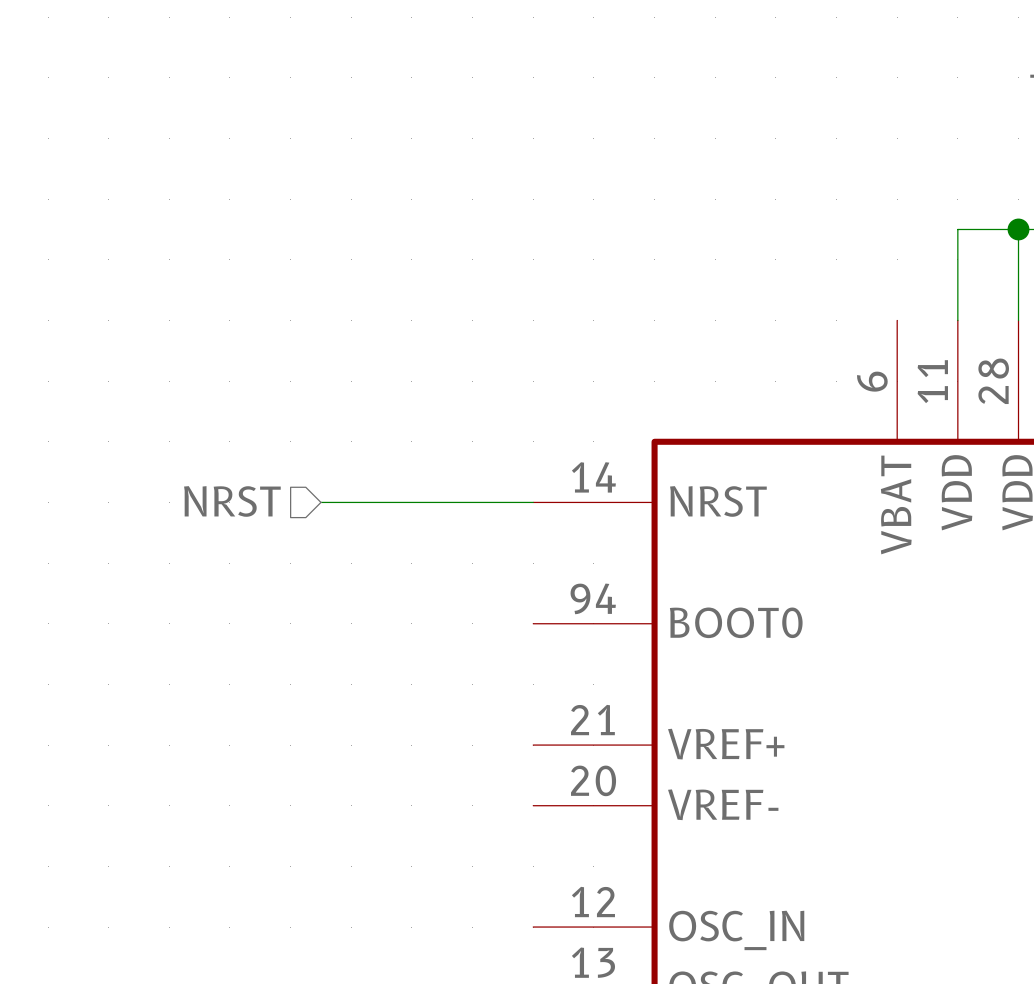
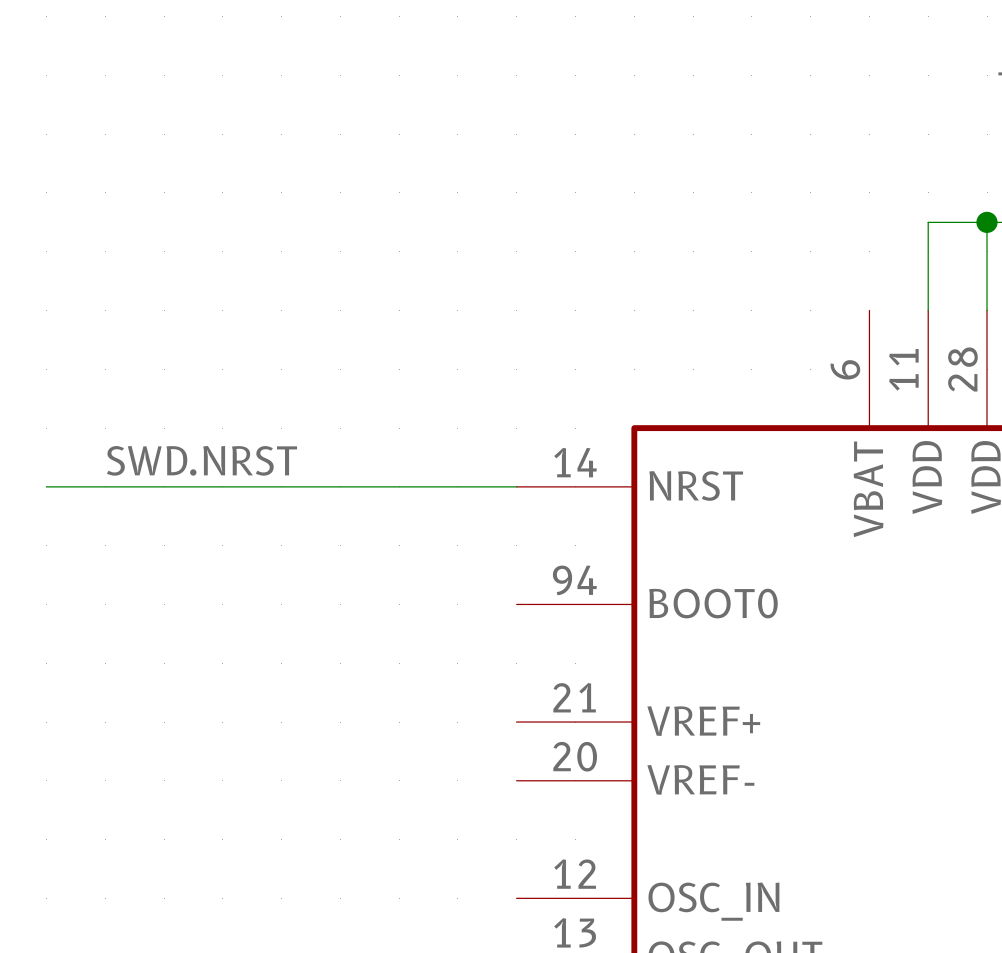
label: none -> SWD.NRST (201, 460)
hierarchical label: NRST (232, 501) -> none
wire: none -> (46, 486) (311, 486)

